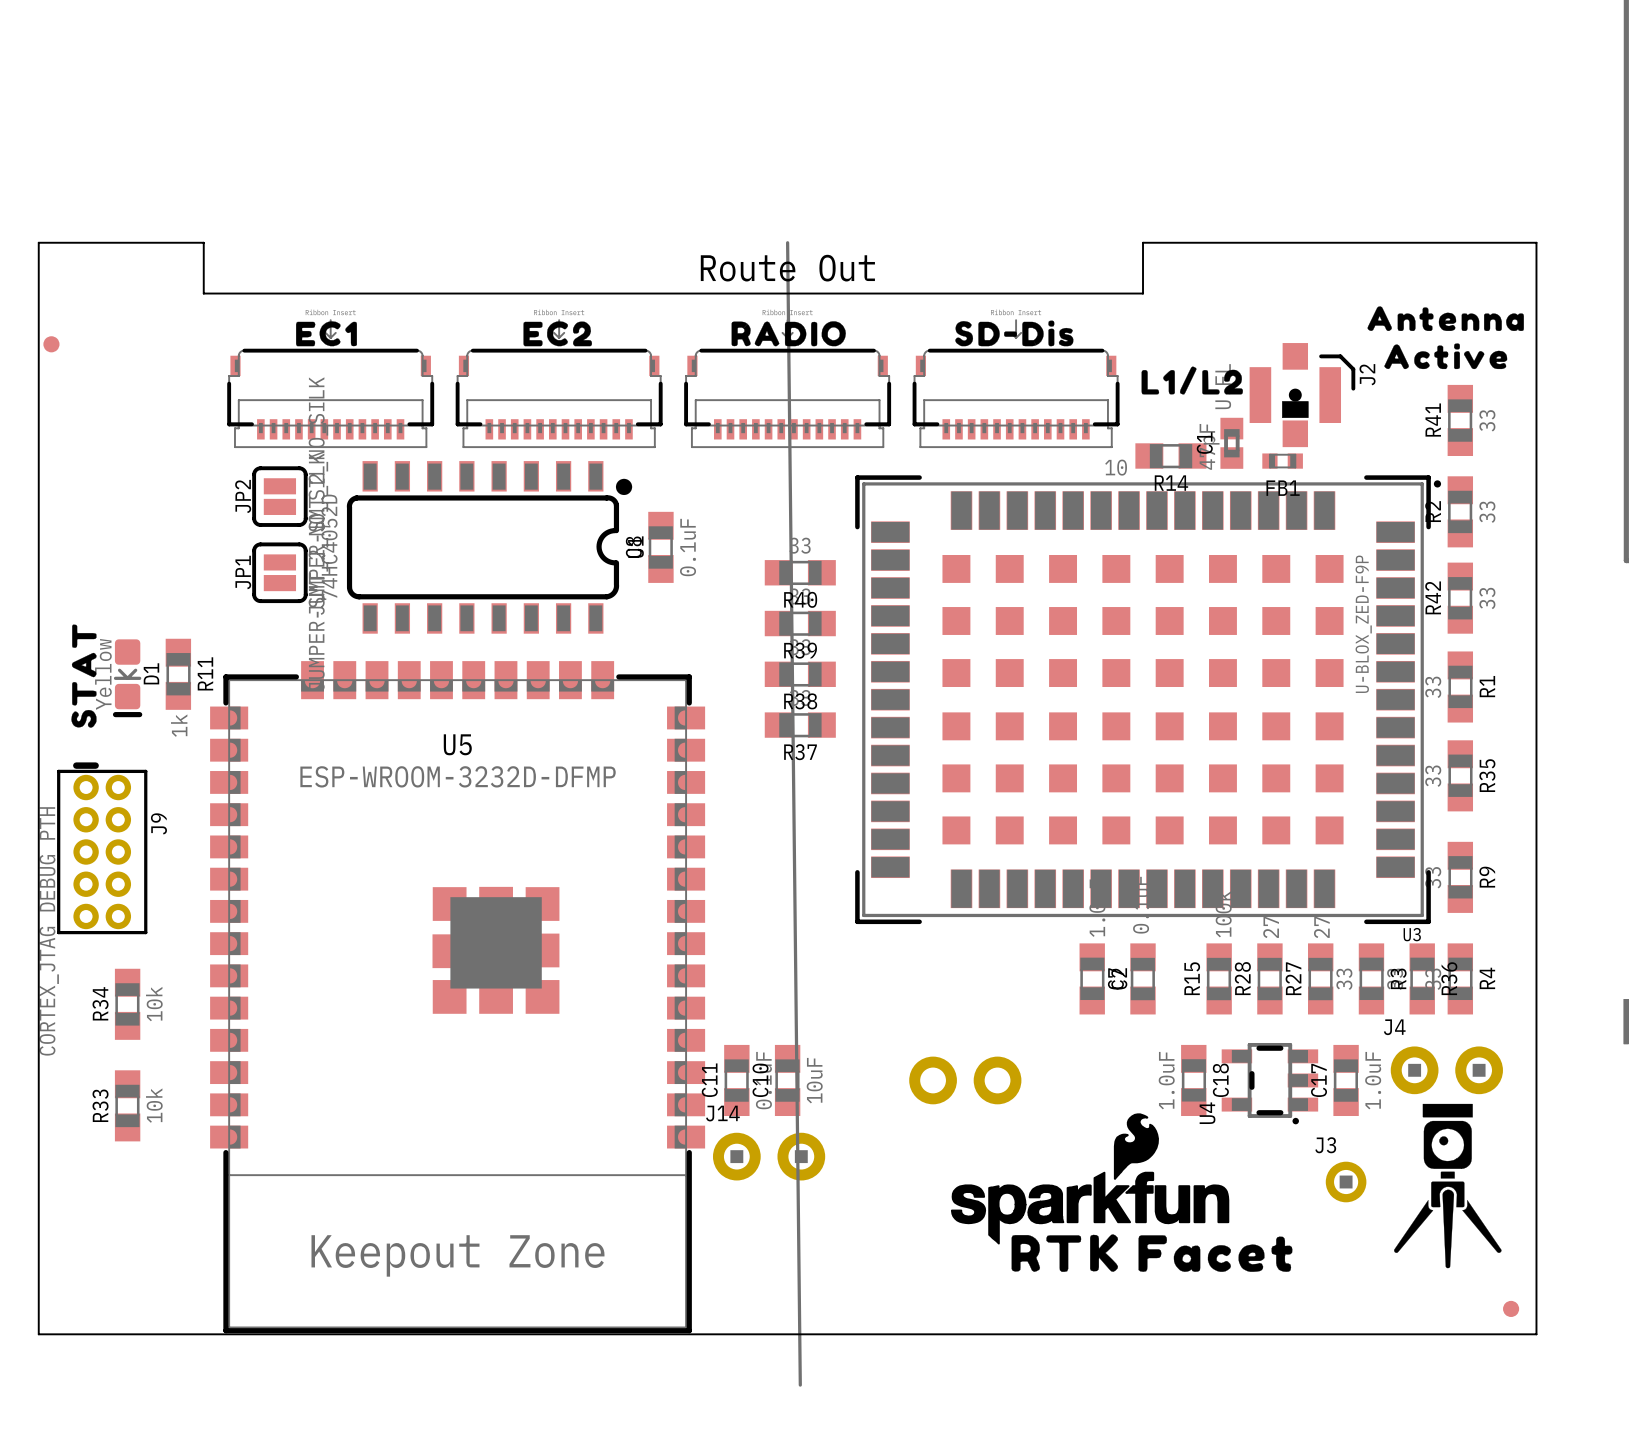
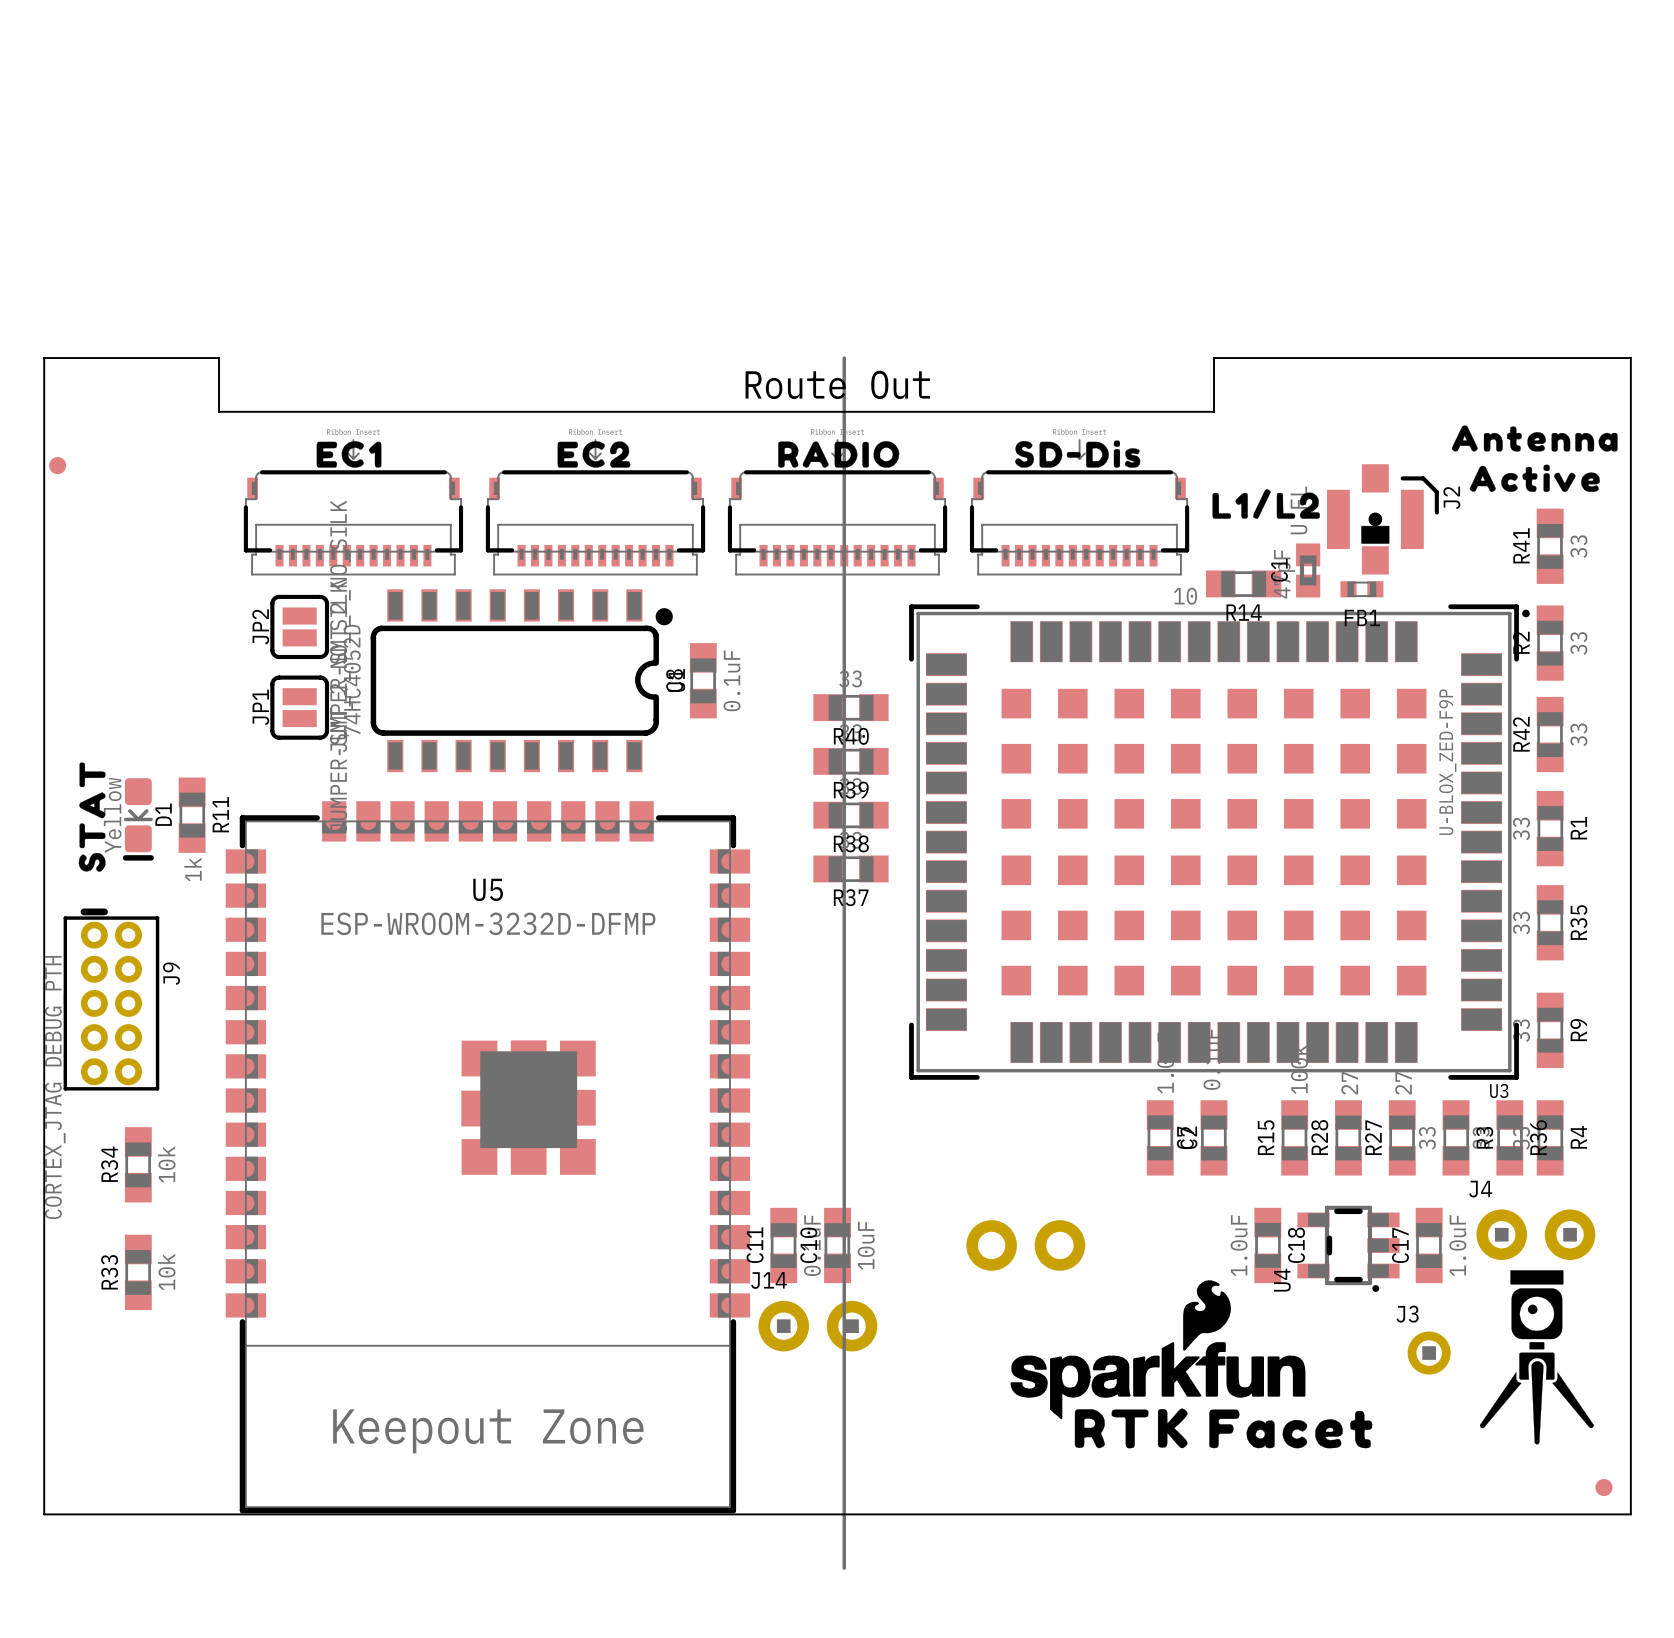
line: (787, 242) (800, 1385) -> none
line: none -> (844, 358) (844, 1568)

